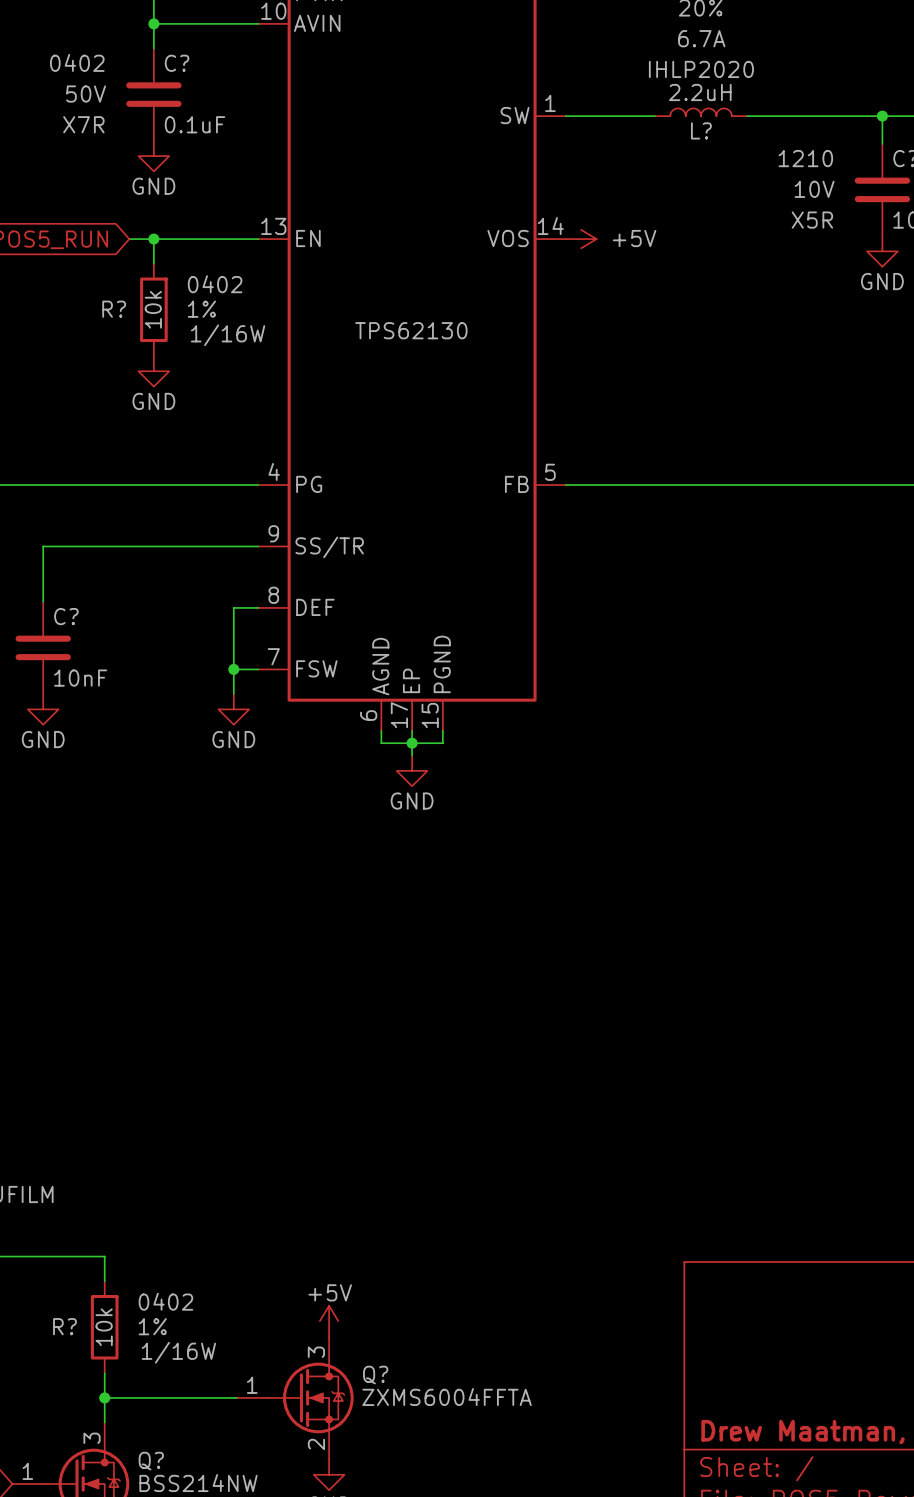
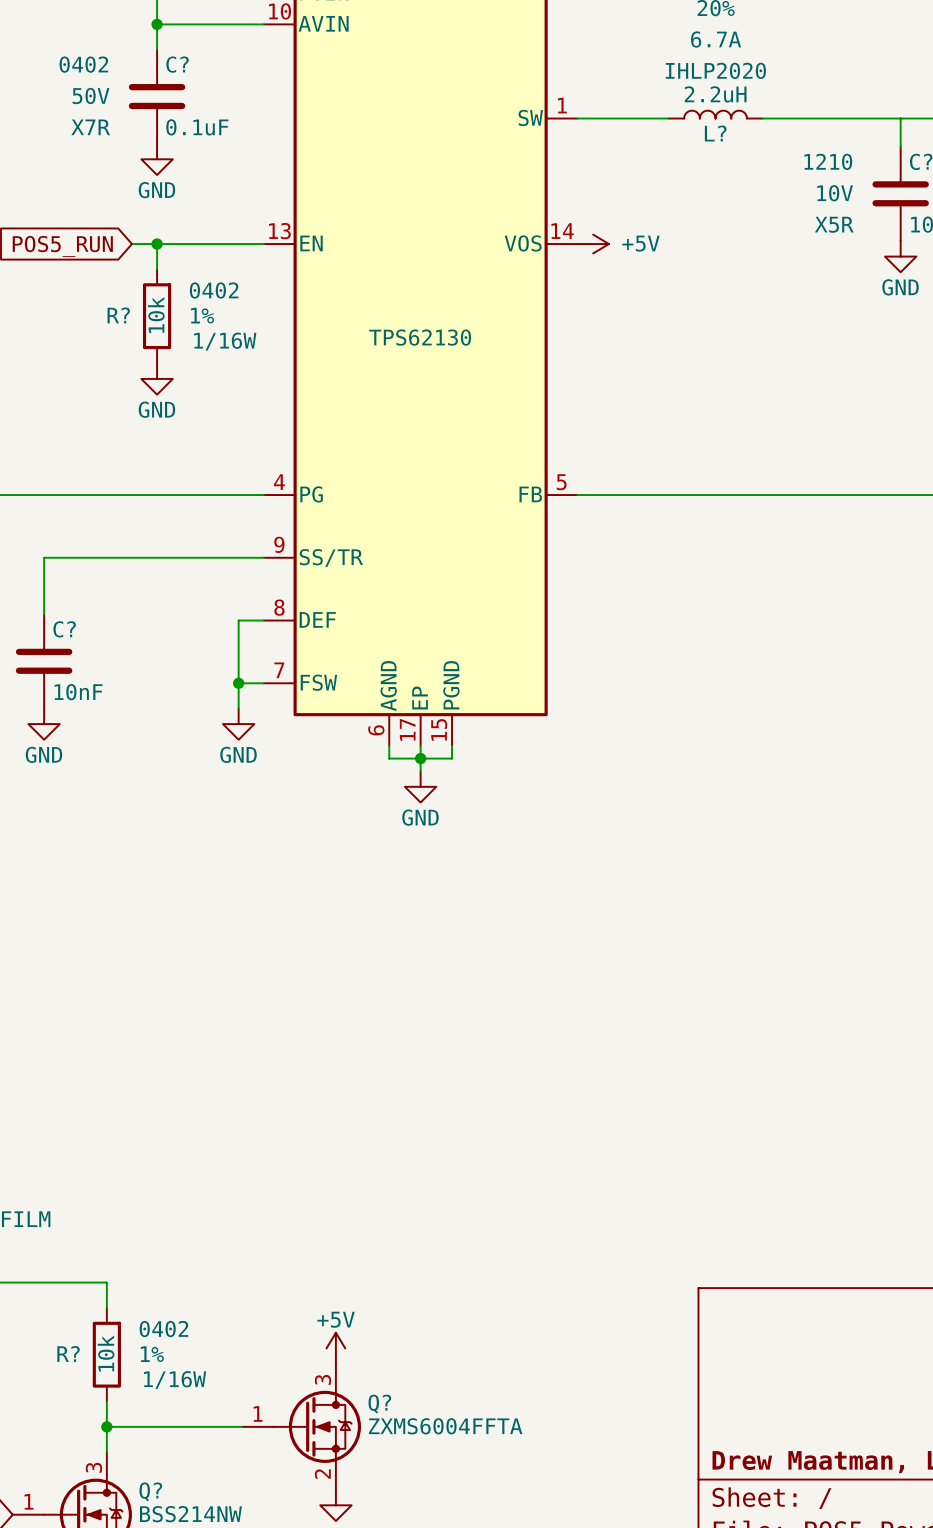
junction: (882, 116) -> none

